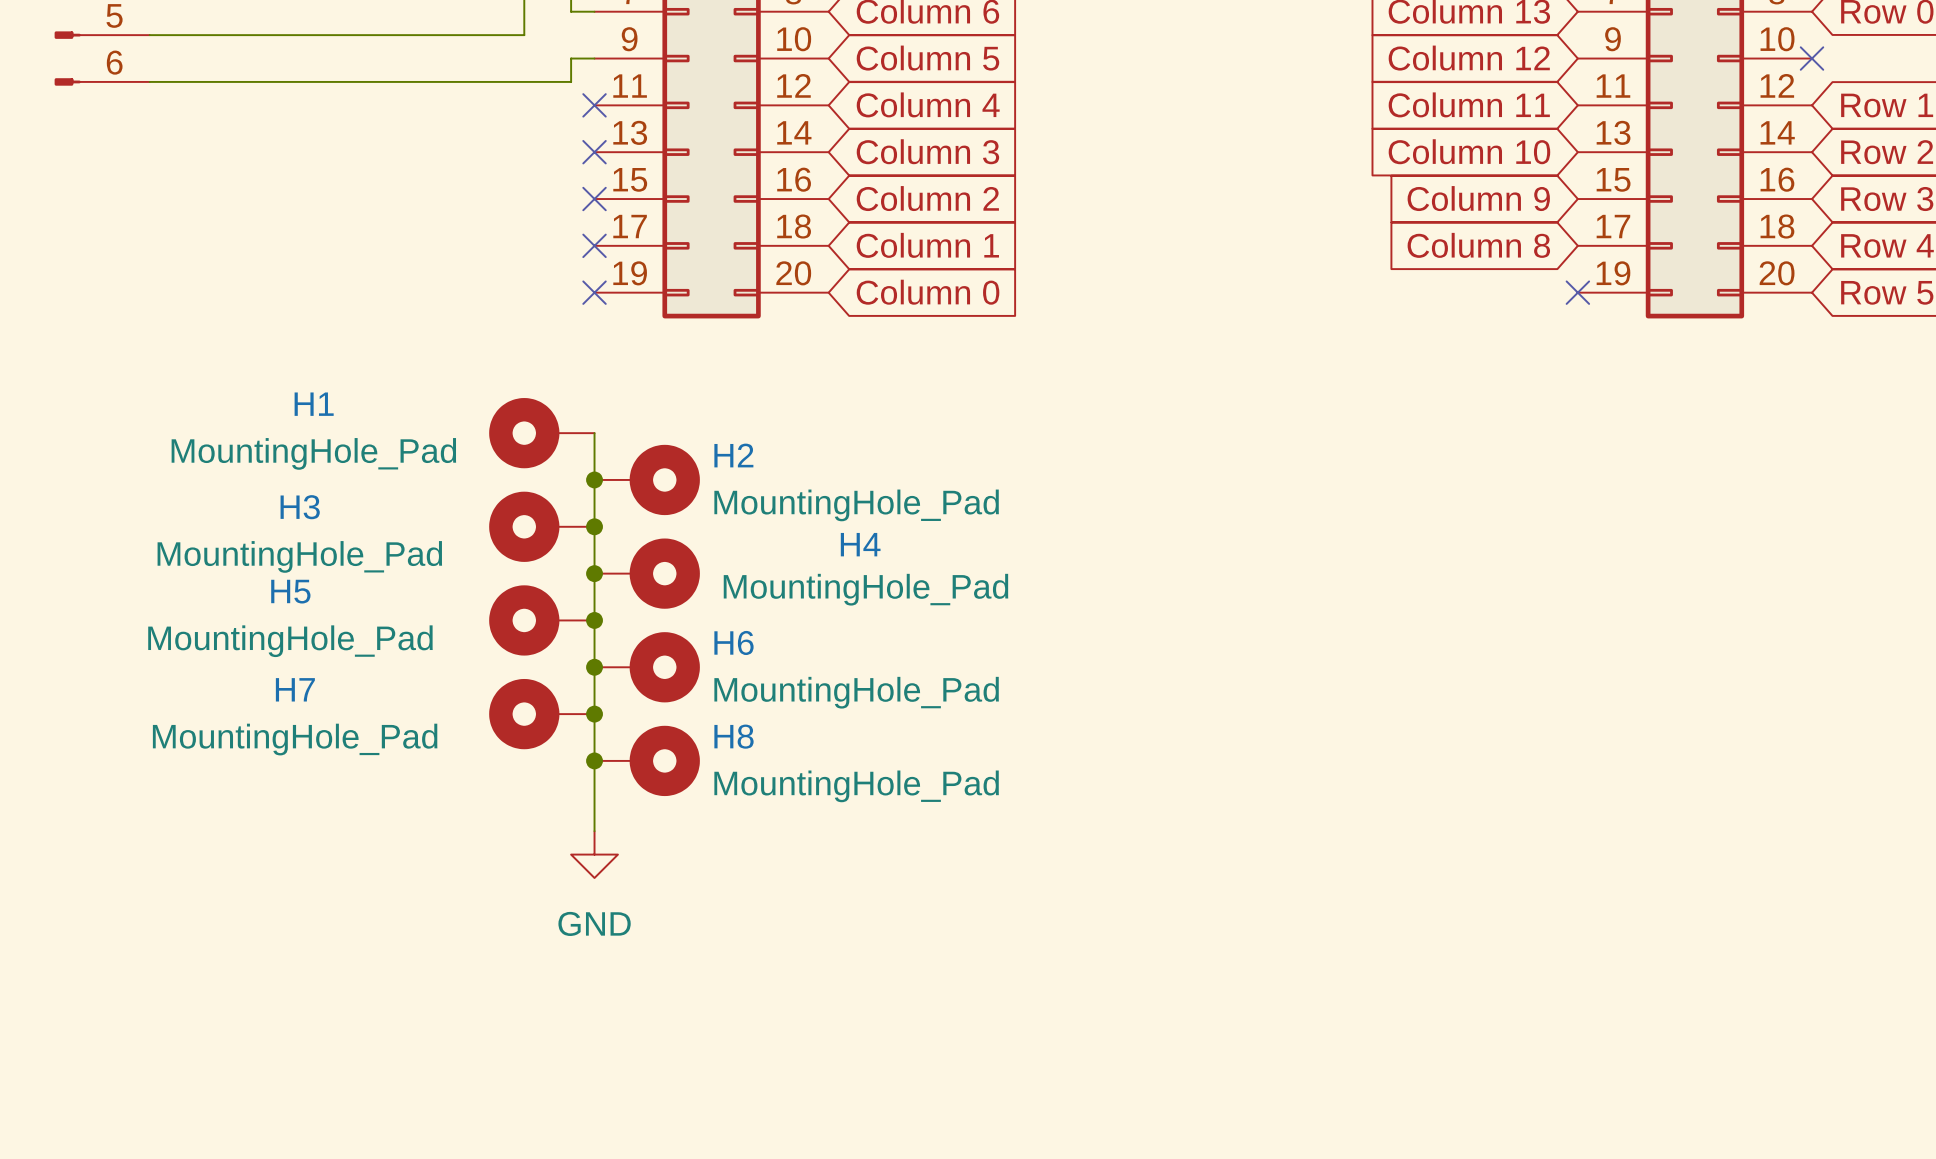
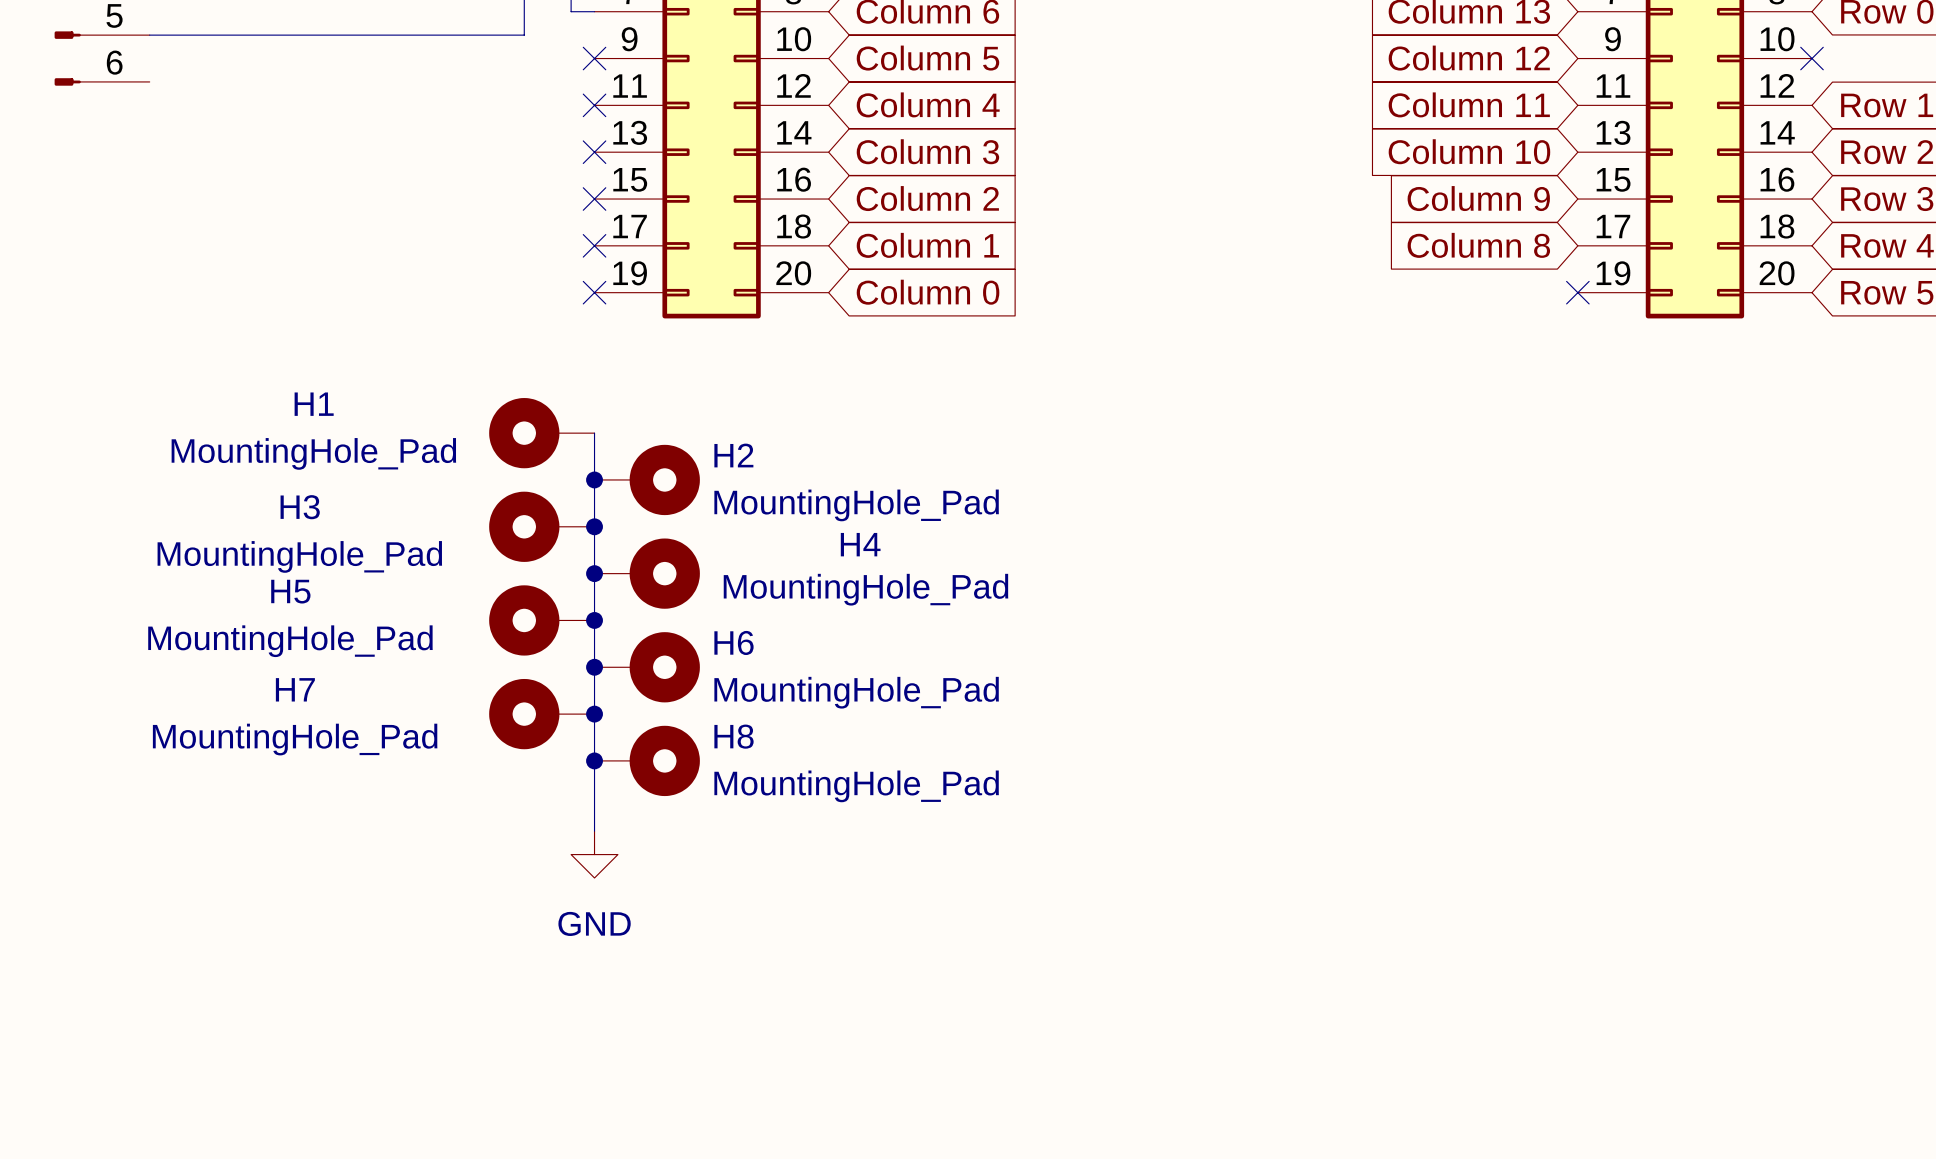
wire: (594, 58) (571, 58) (571, 81) (149, 81) -> none
no-connect mark: none -> (594, 58)

